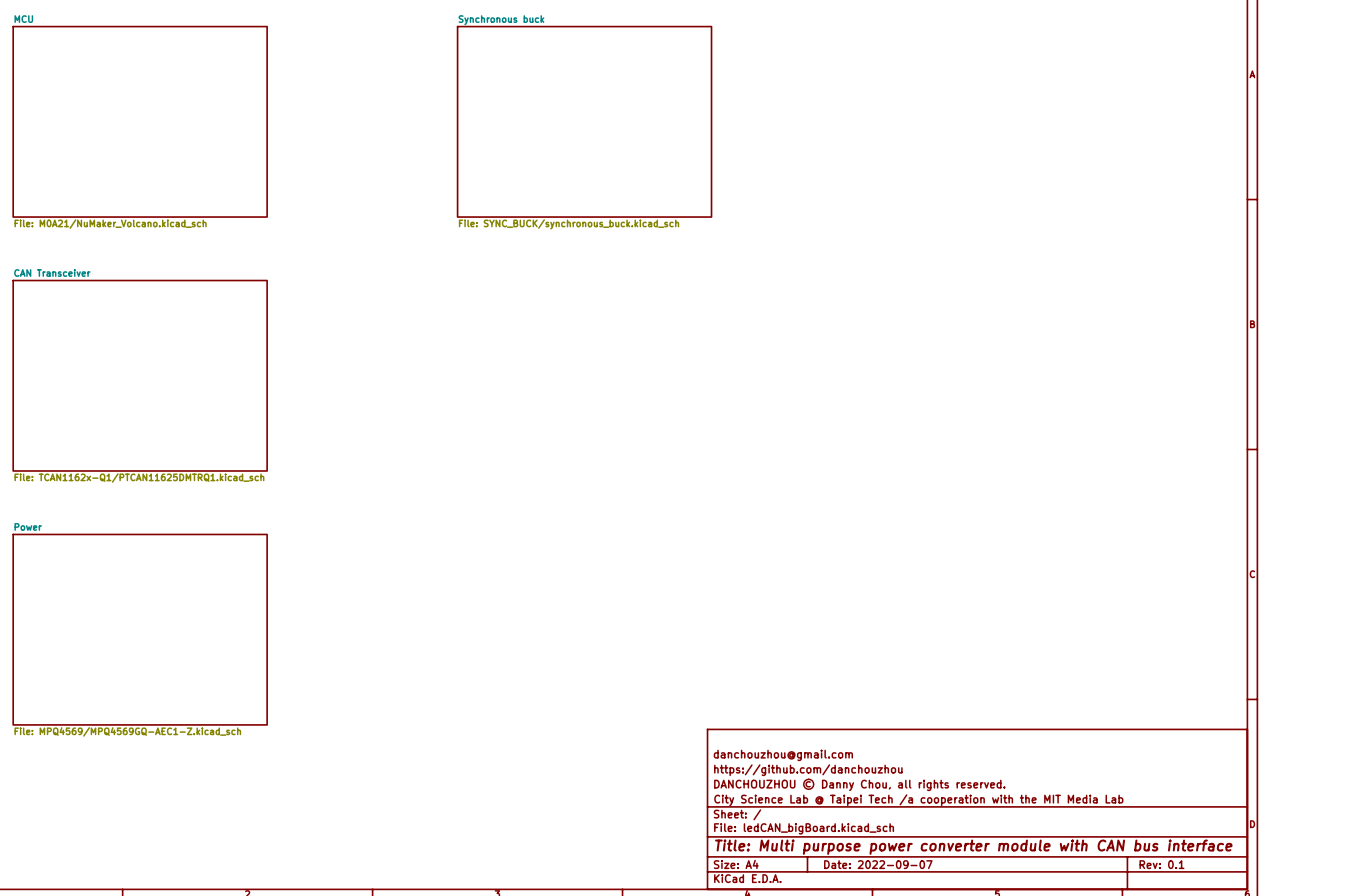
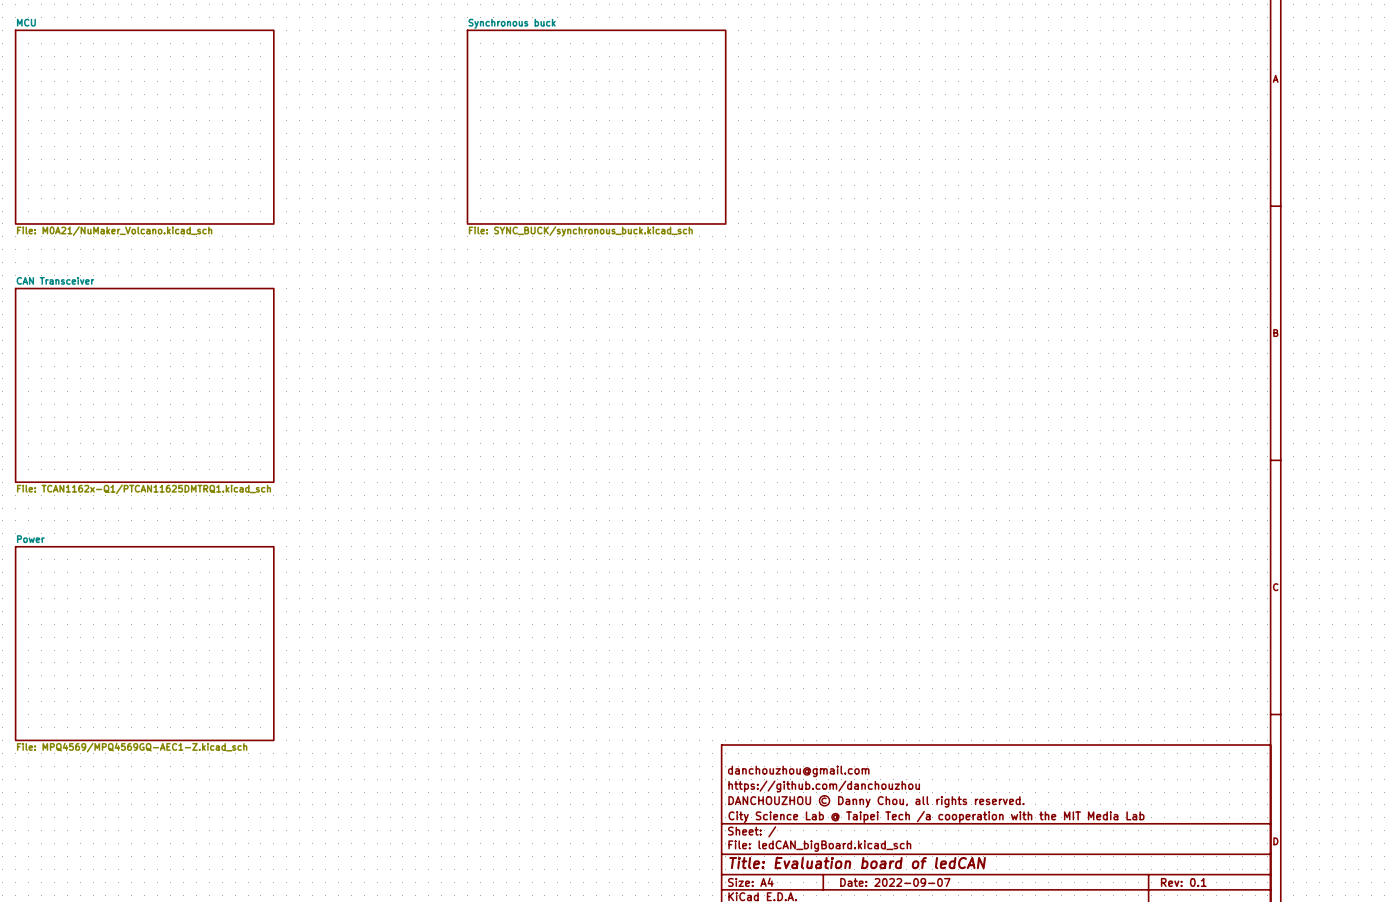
title block: Title: Multi purpose power converter module with CAN bus interface (973, 847) -> Title: Evaluation board of ledCAN (857, 863)

